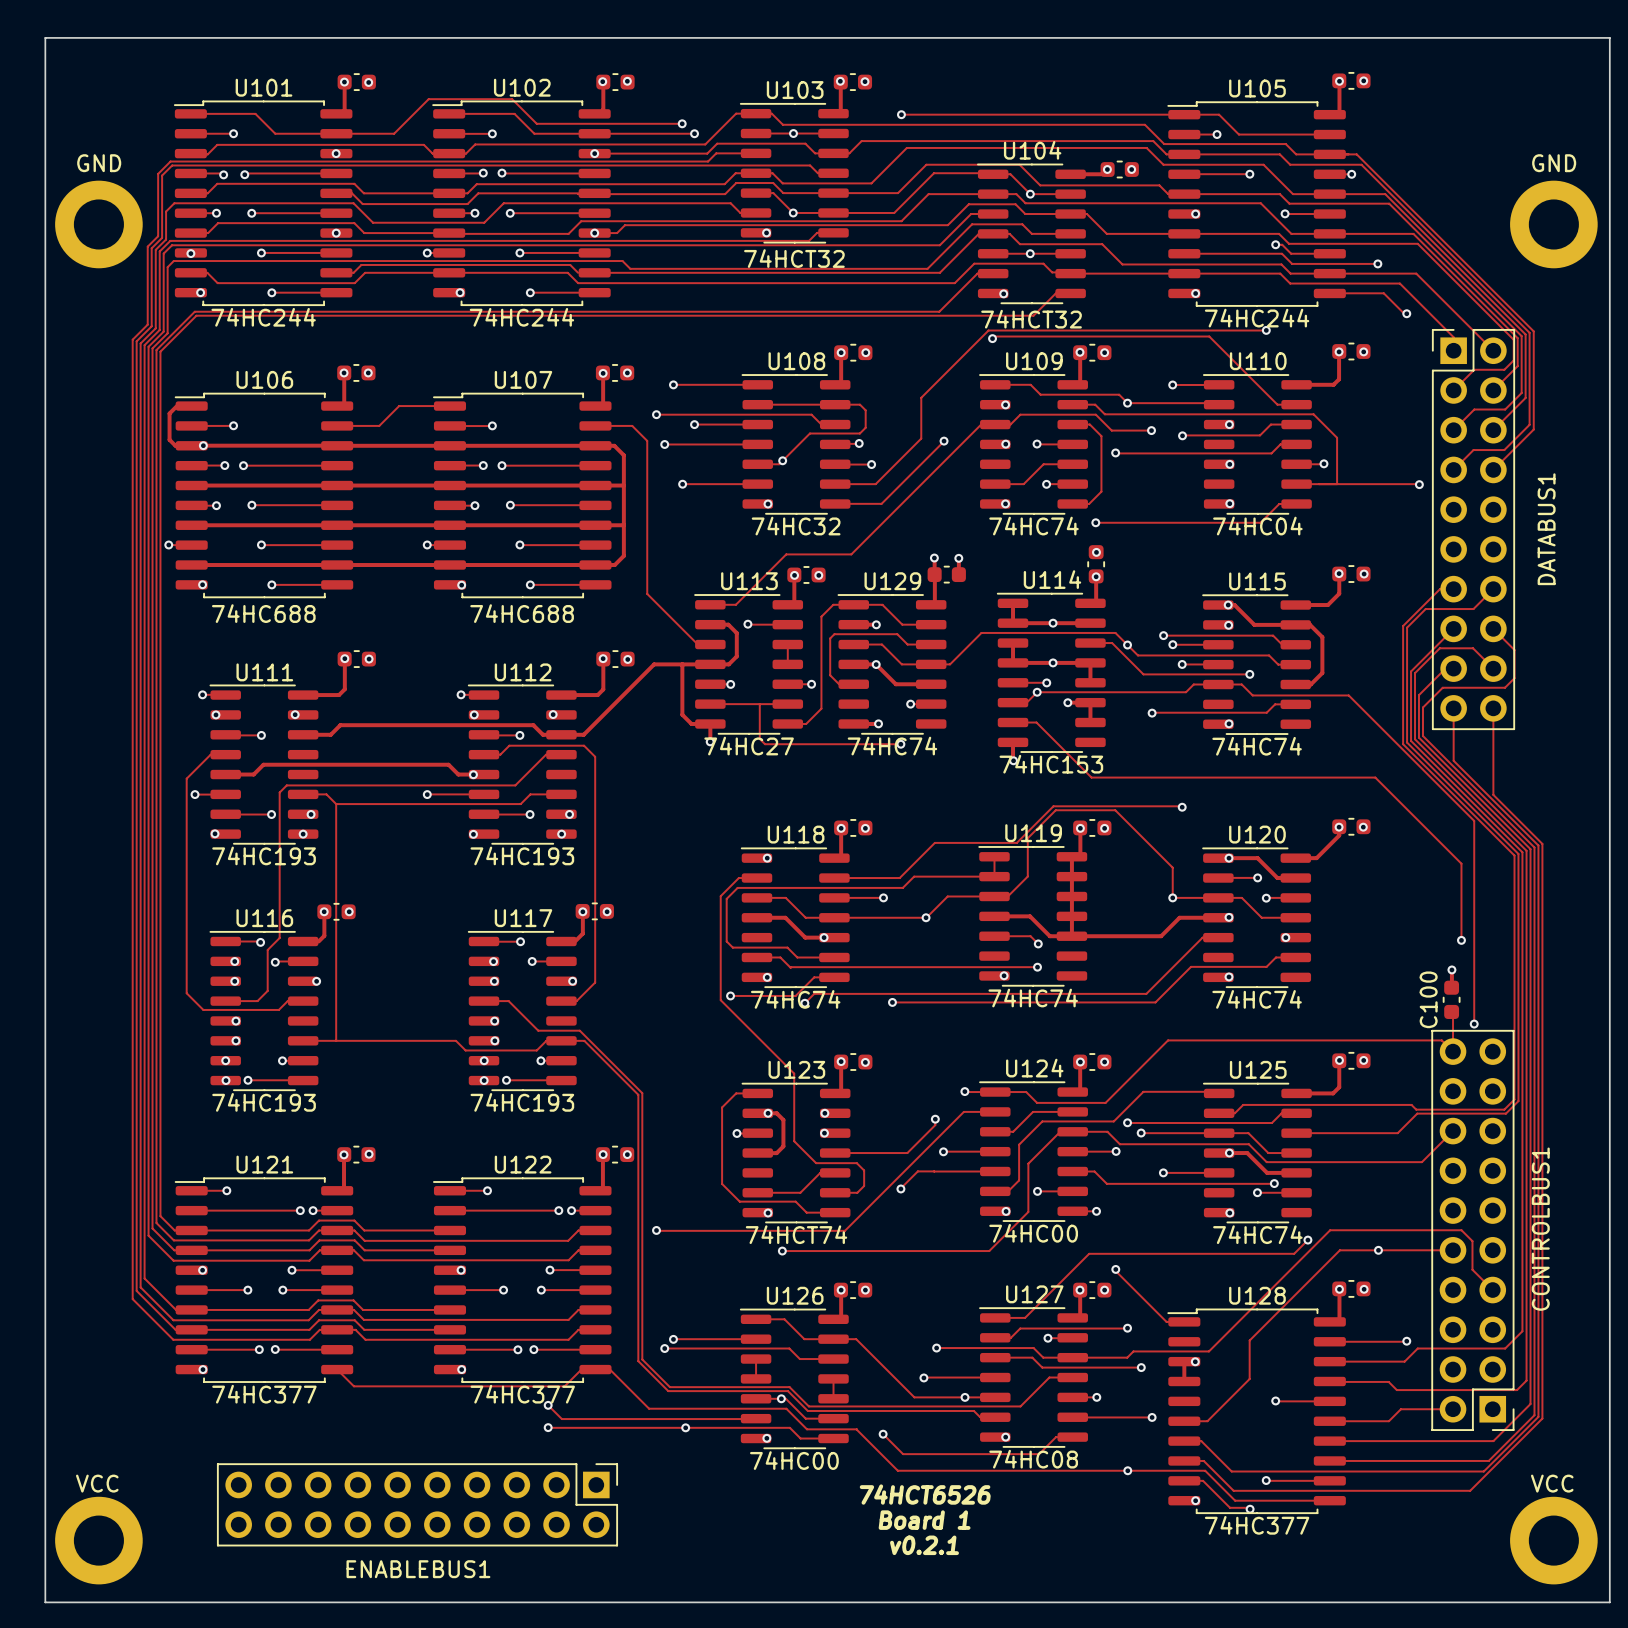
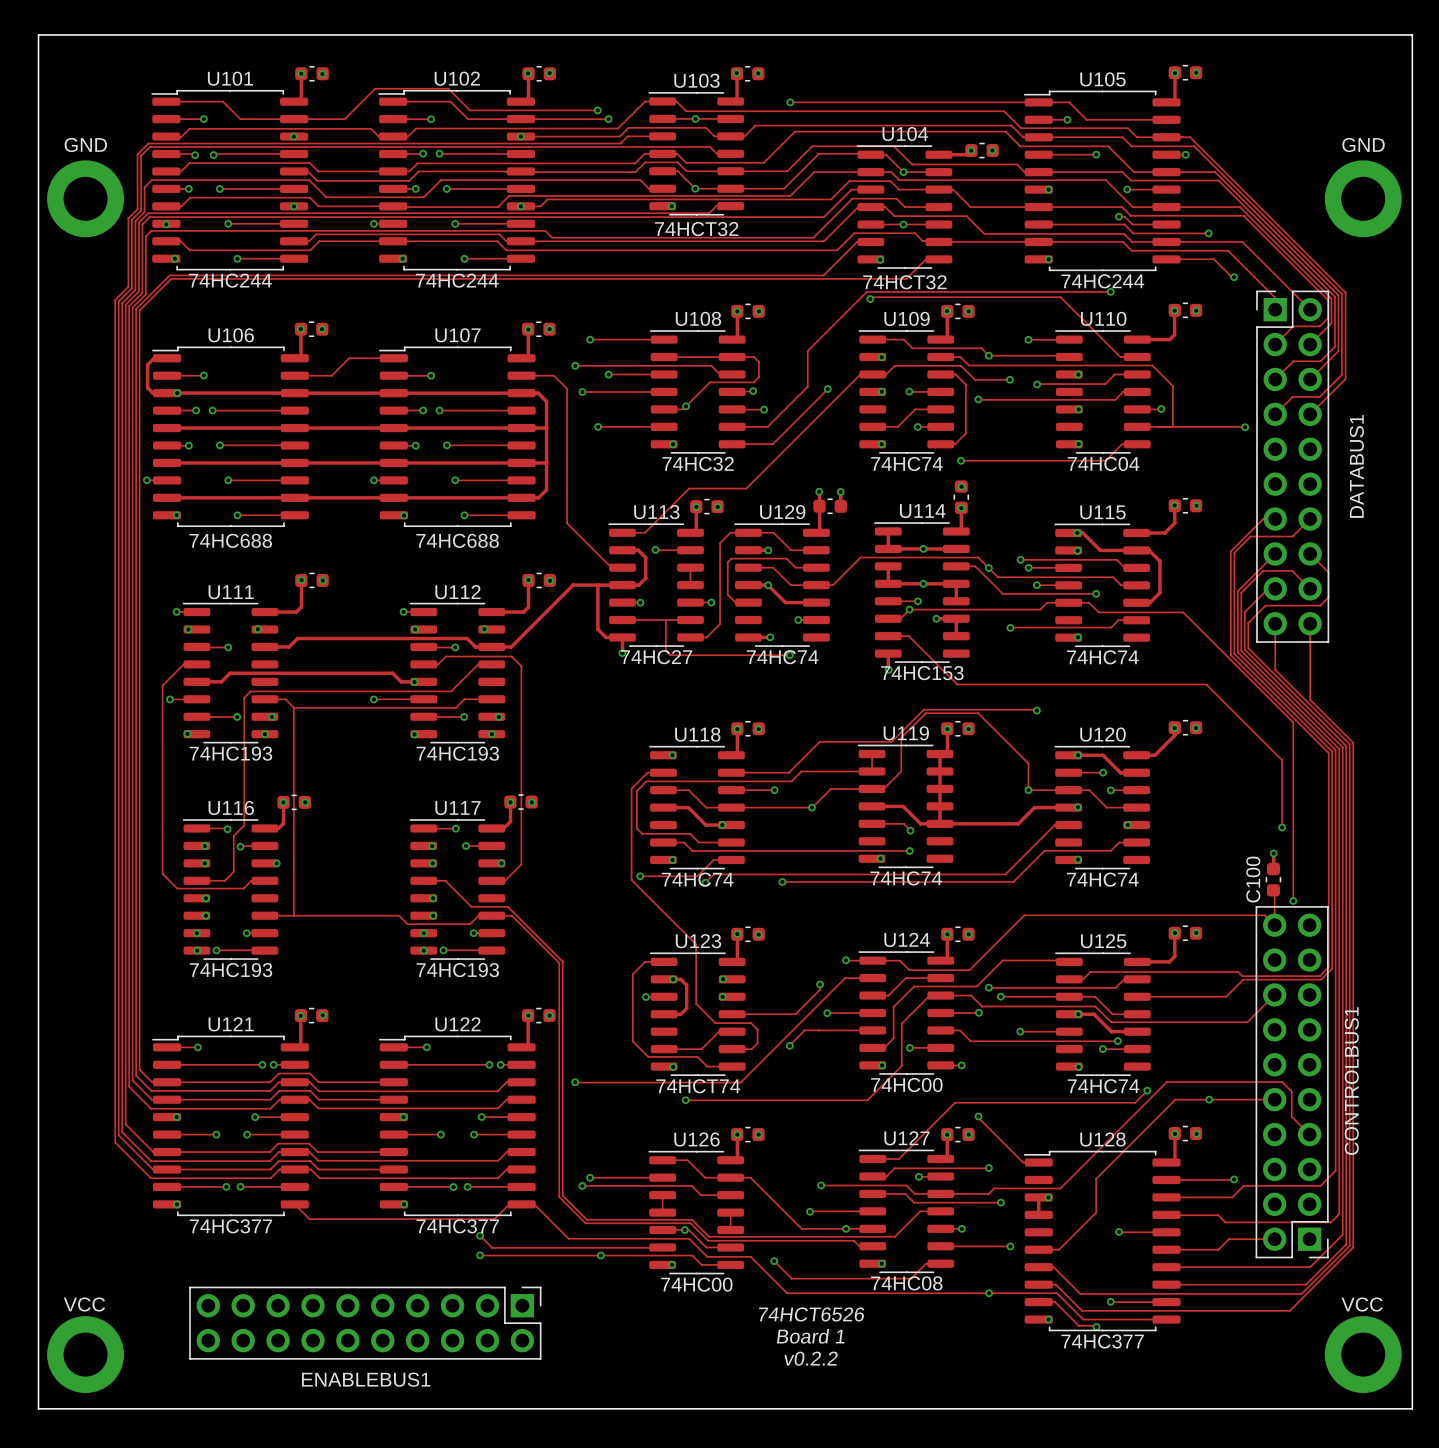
text: v0.2.1 (924, 1545) -> v0.2.2 (811, 1358)

